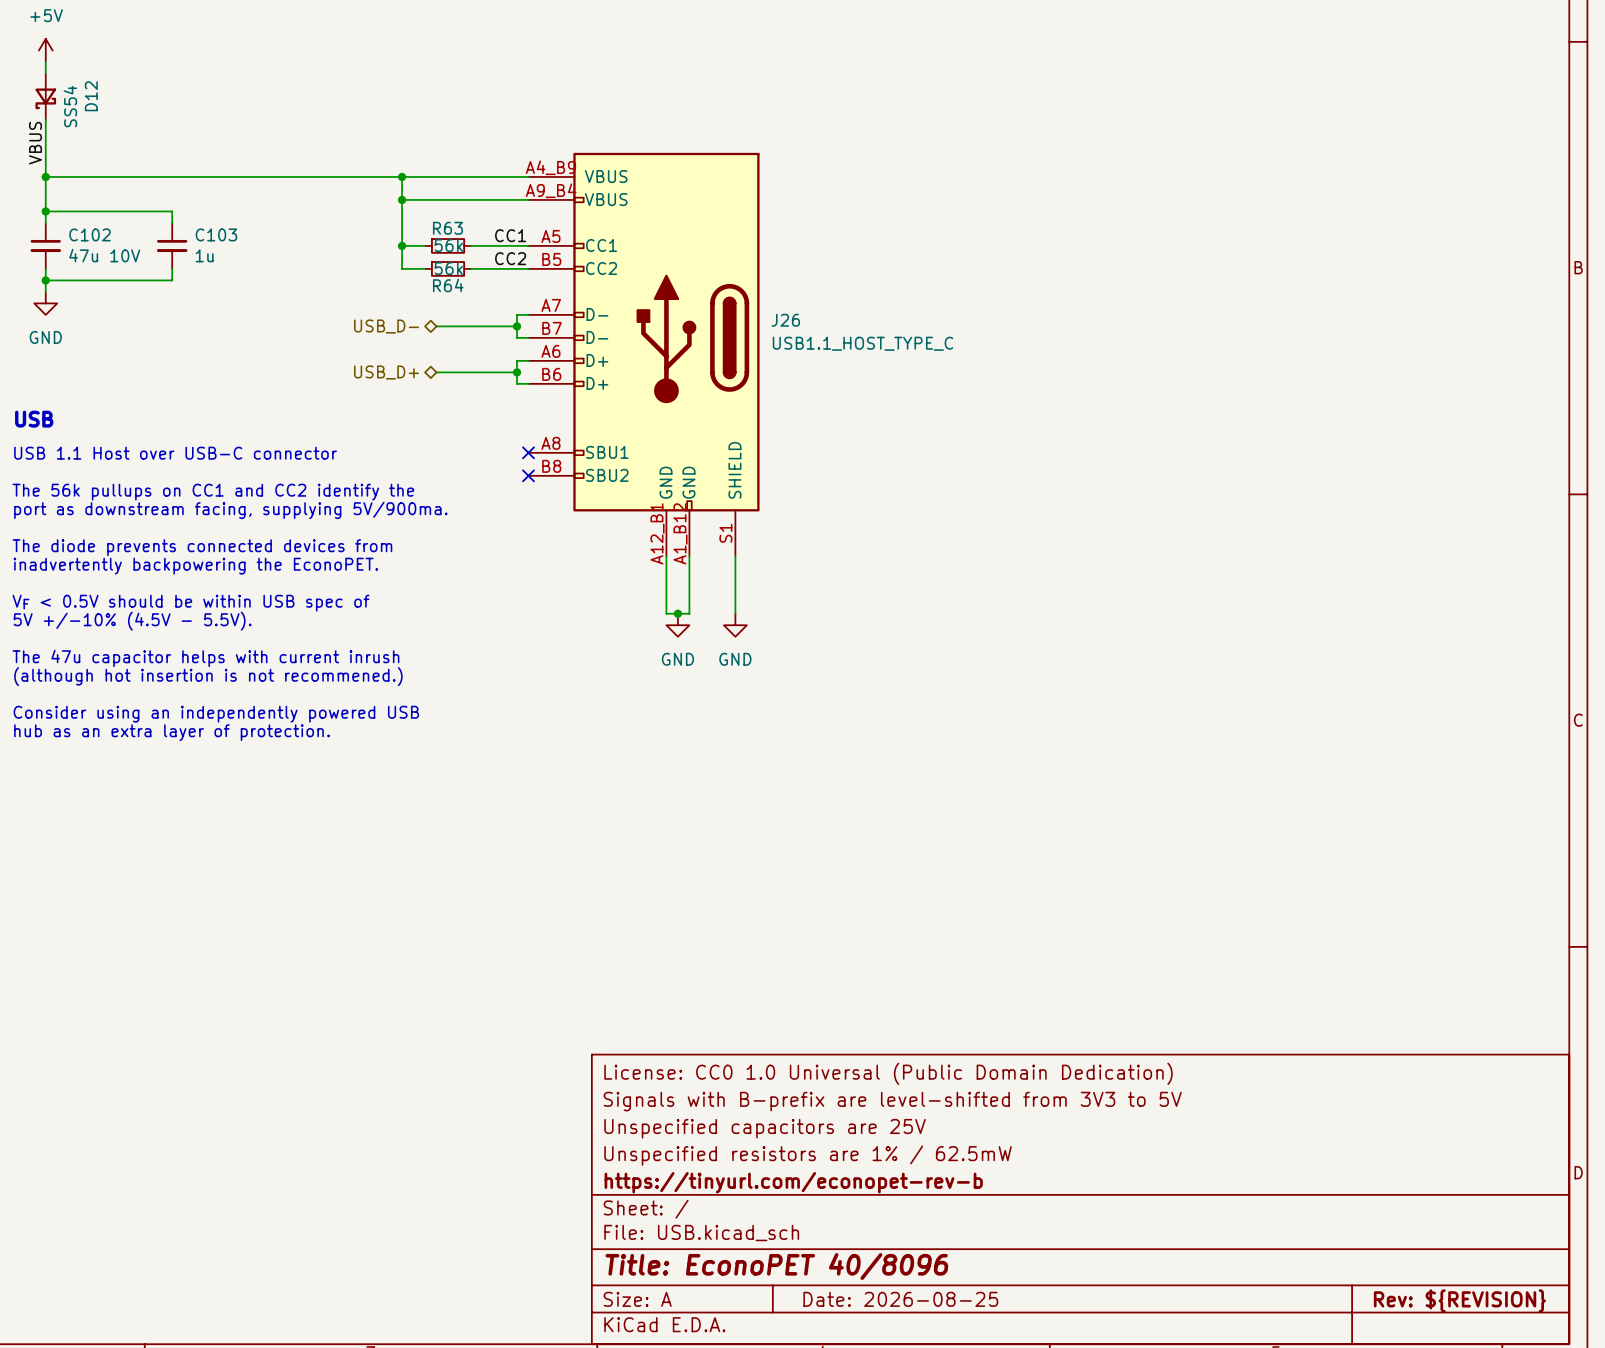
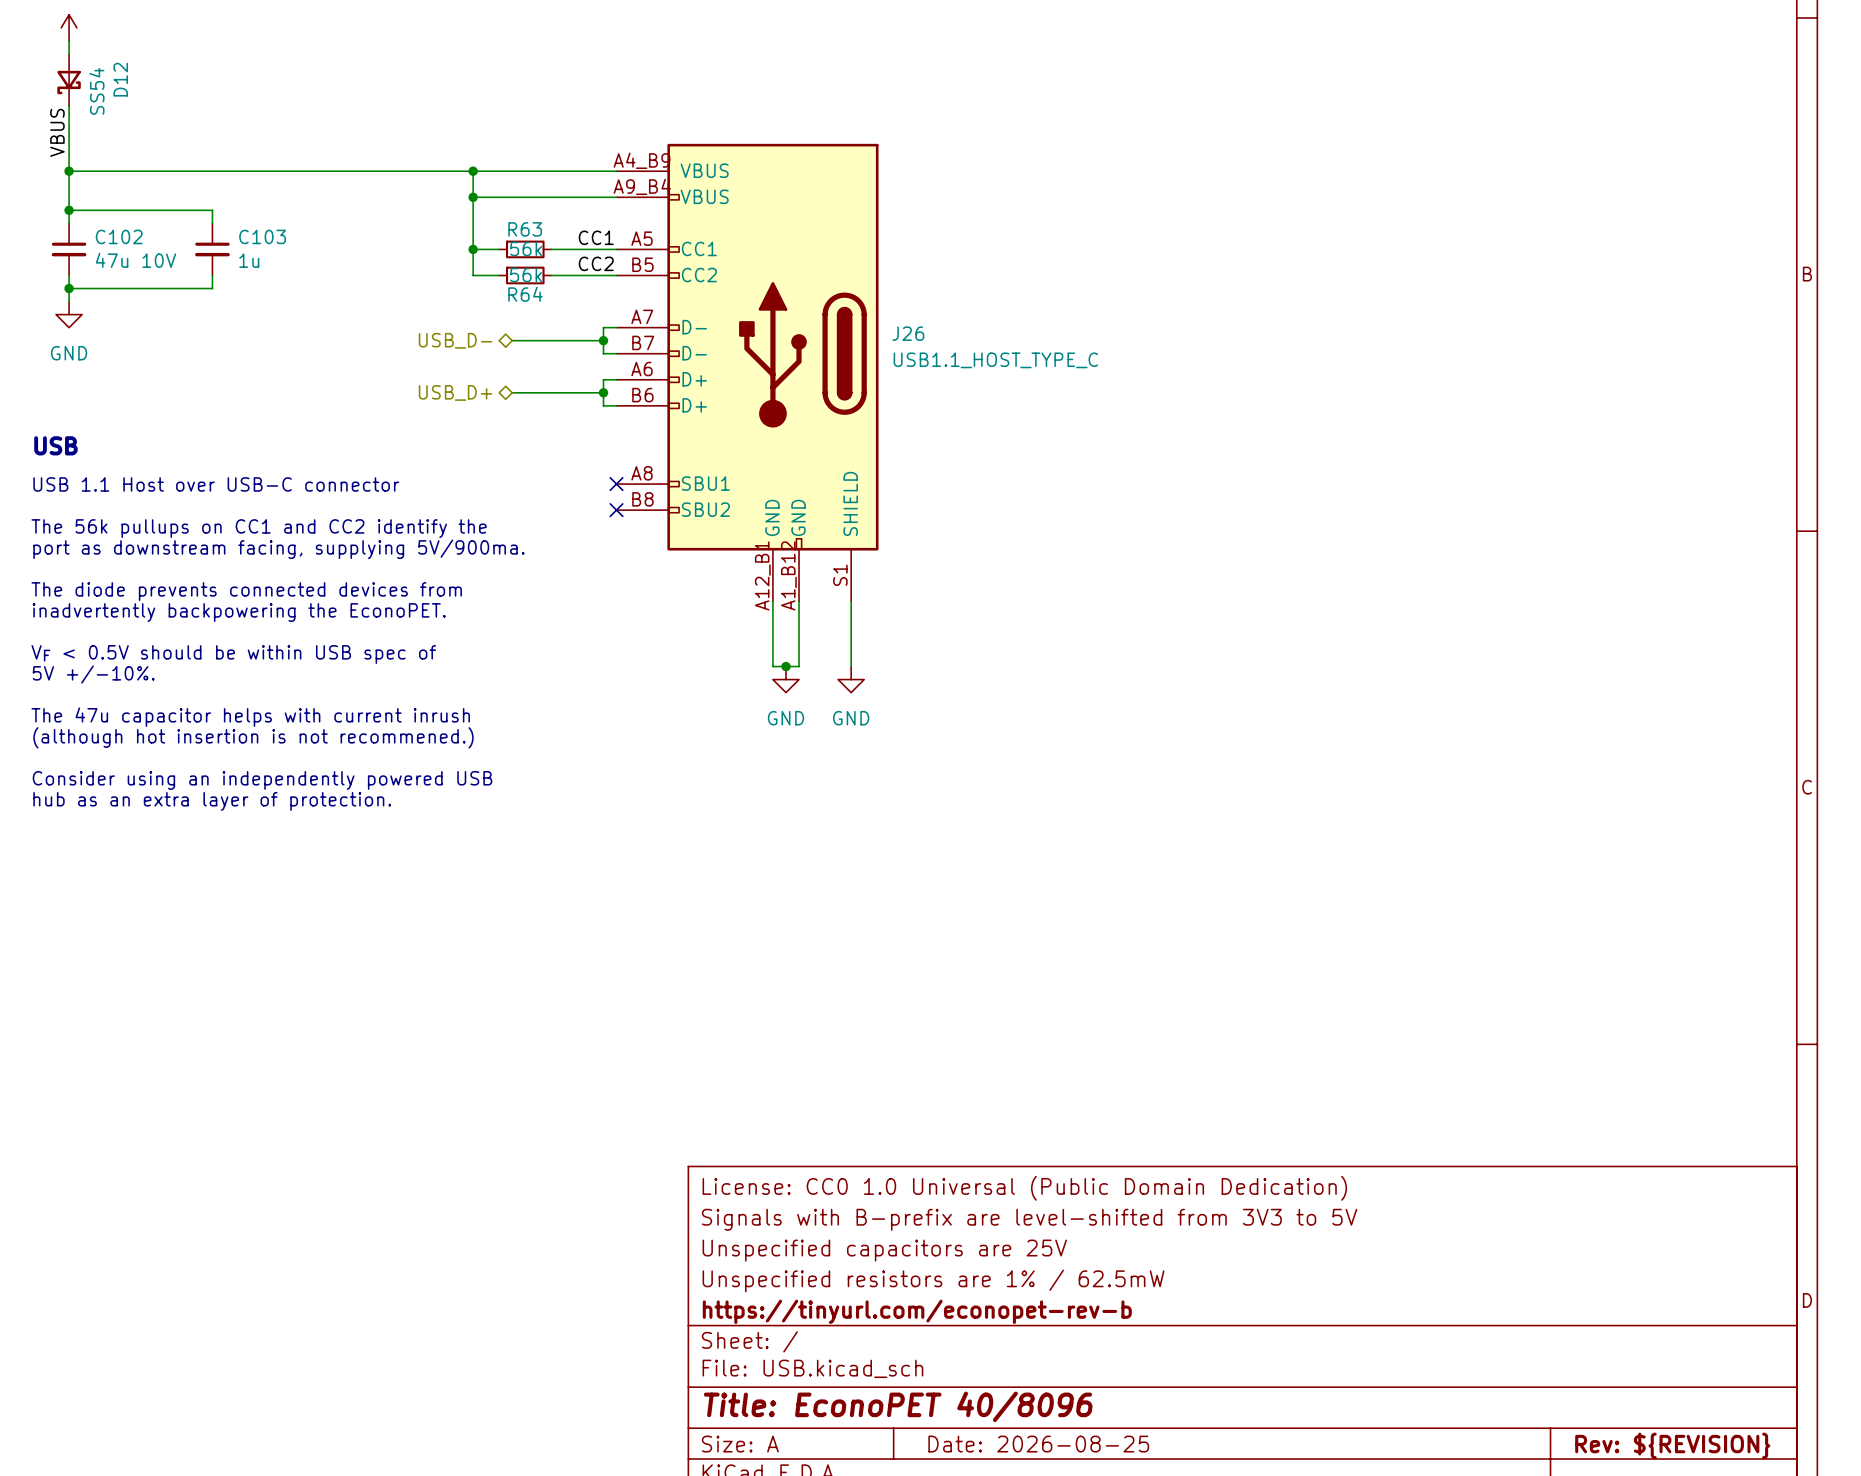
text: 5V +/-10% (4.5V - 5.5V). (132, 621) -> 5V +/-10%. (93, 674)

